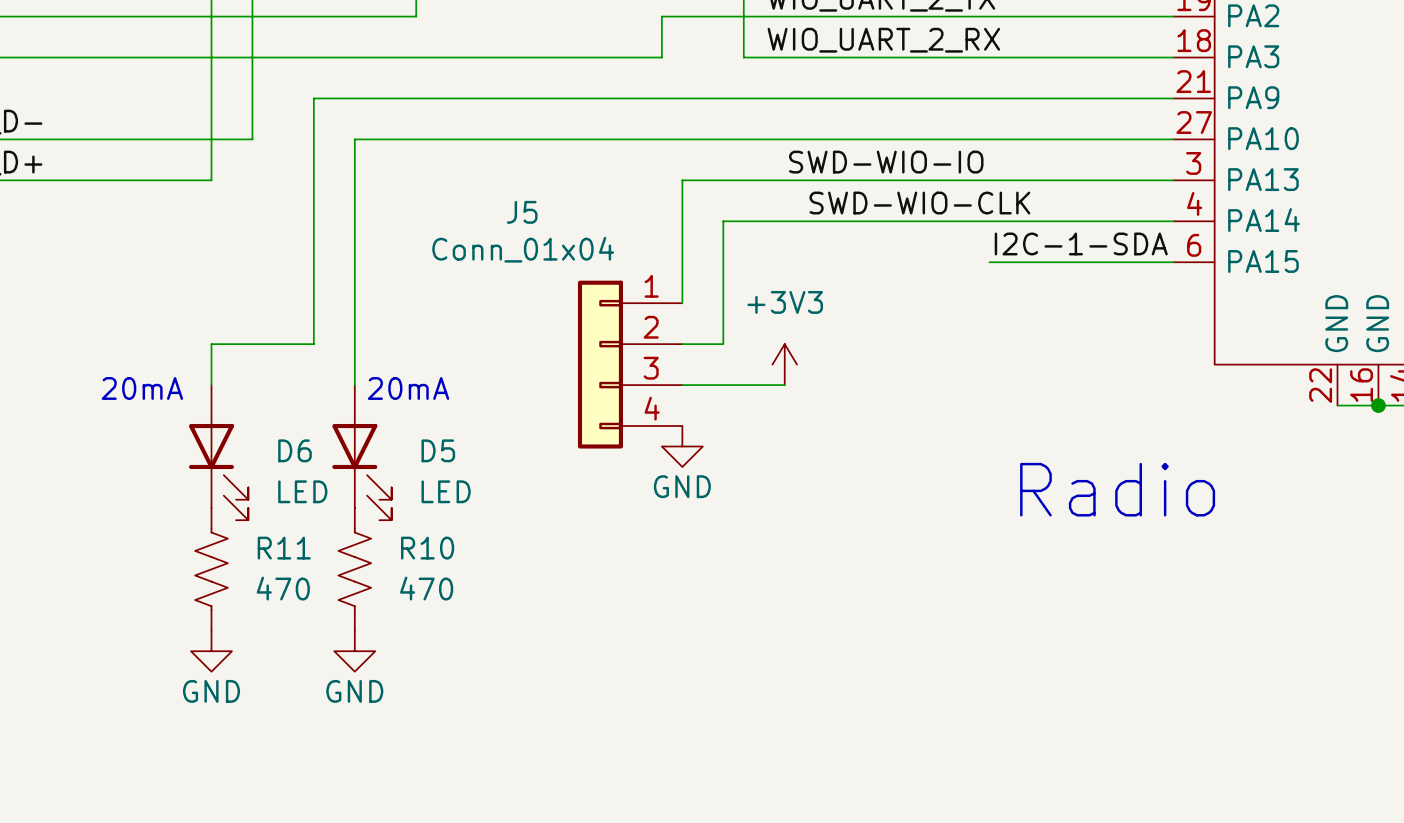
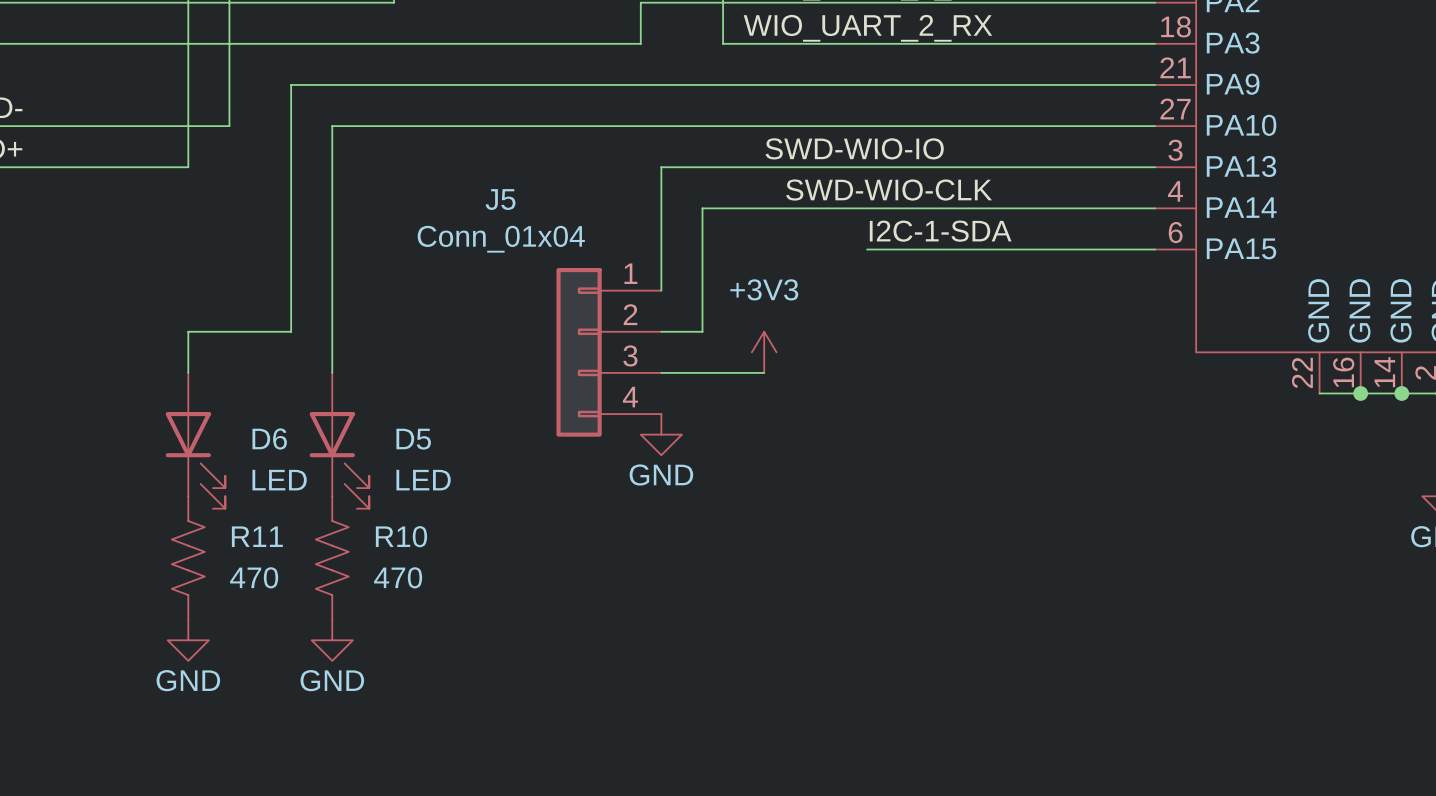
label position: I2C-1-SDA (1081, 243) -> I2C-1-SDA (940, 231)
wire: none -> (867, 249) (969, 249)
text: 20mA (142, 388) -> none
text: 20mA (408, 388) -> none
text: Radio (1117, 489) -> none

